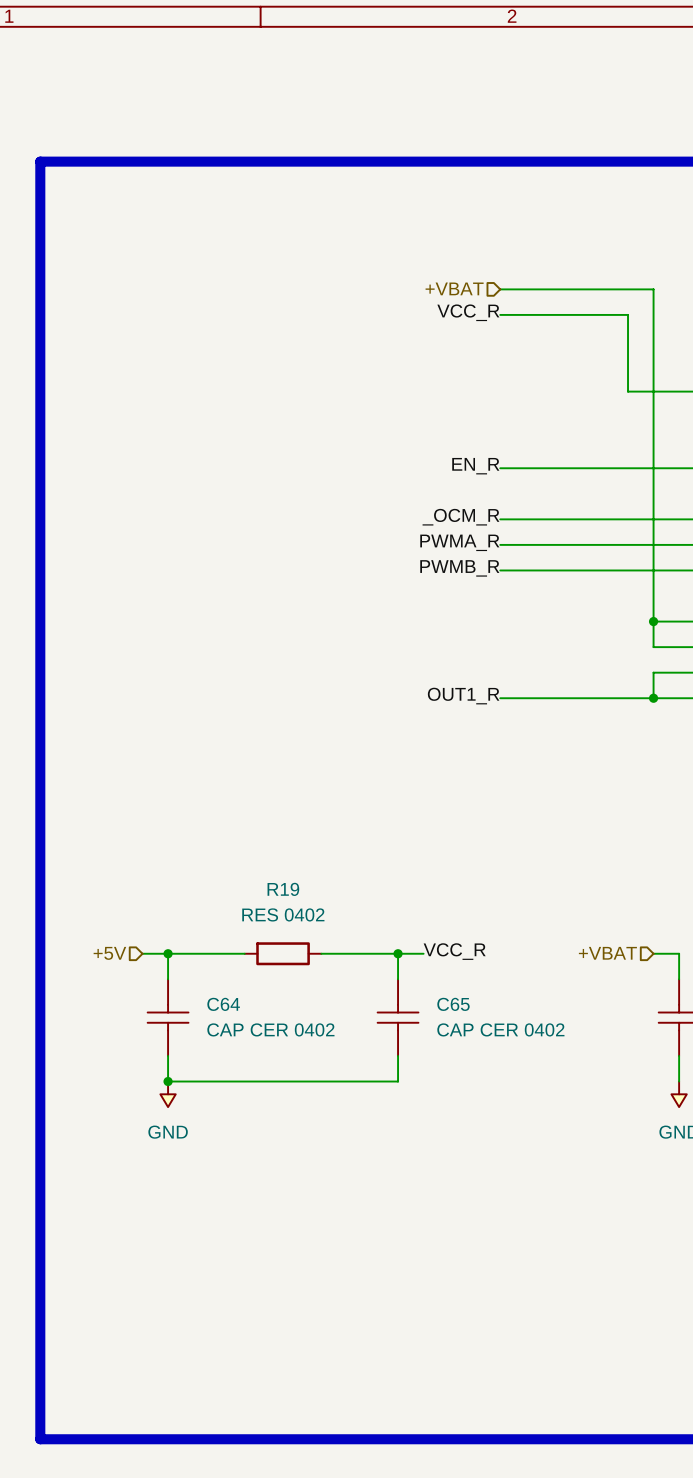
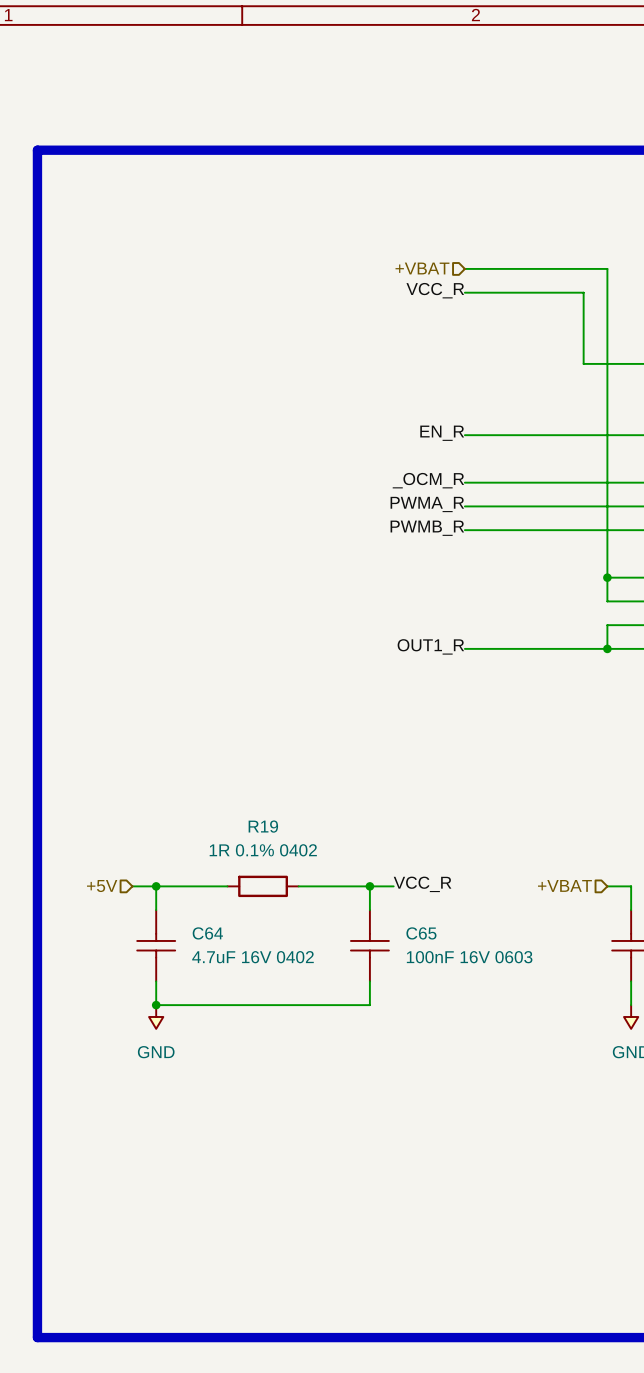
R19 value: RES 0402 (283, 914) -> 1R 0.1% 0402 (263, 850)
C64 value: CAP CER 0402 (270, 1029) -> 4.7uF 16V 0402 (252, 957)
C65 value: CAP CER 0402 (500, 1029) -> 100nF 16V 0603 (469, 957)

